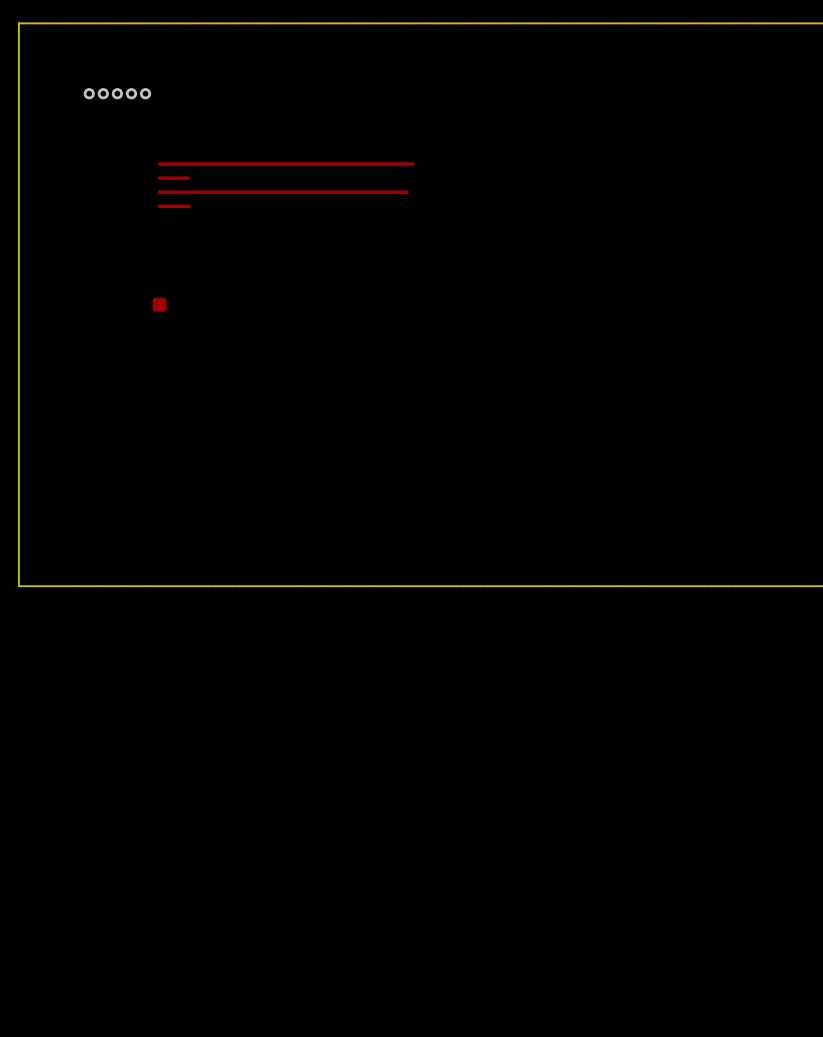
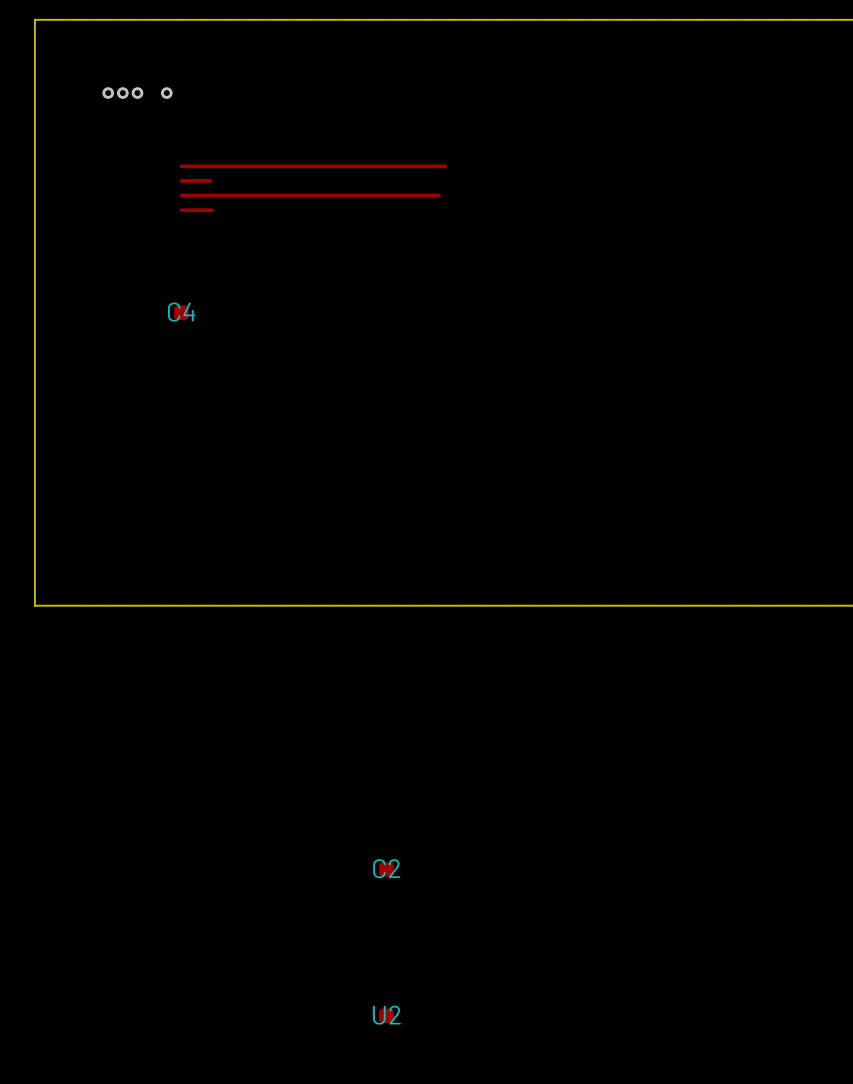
via: (131, 93) -> none
C4 name: none -> C4 (181, 312)
C2: none -> (386, 869)
U2: none -> (386, 1015)

